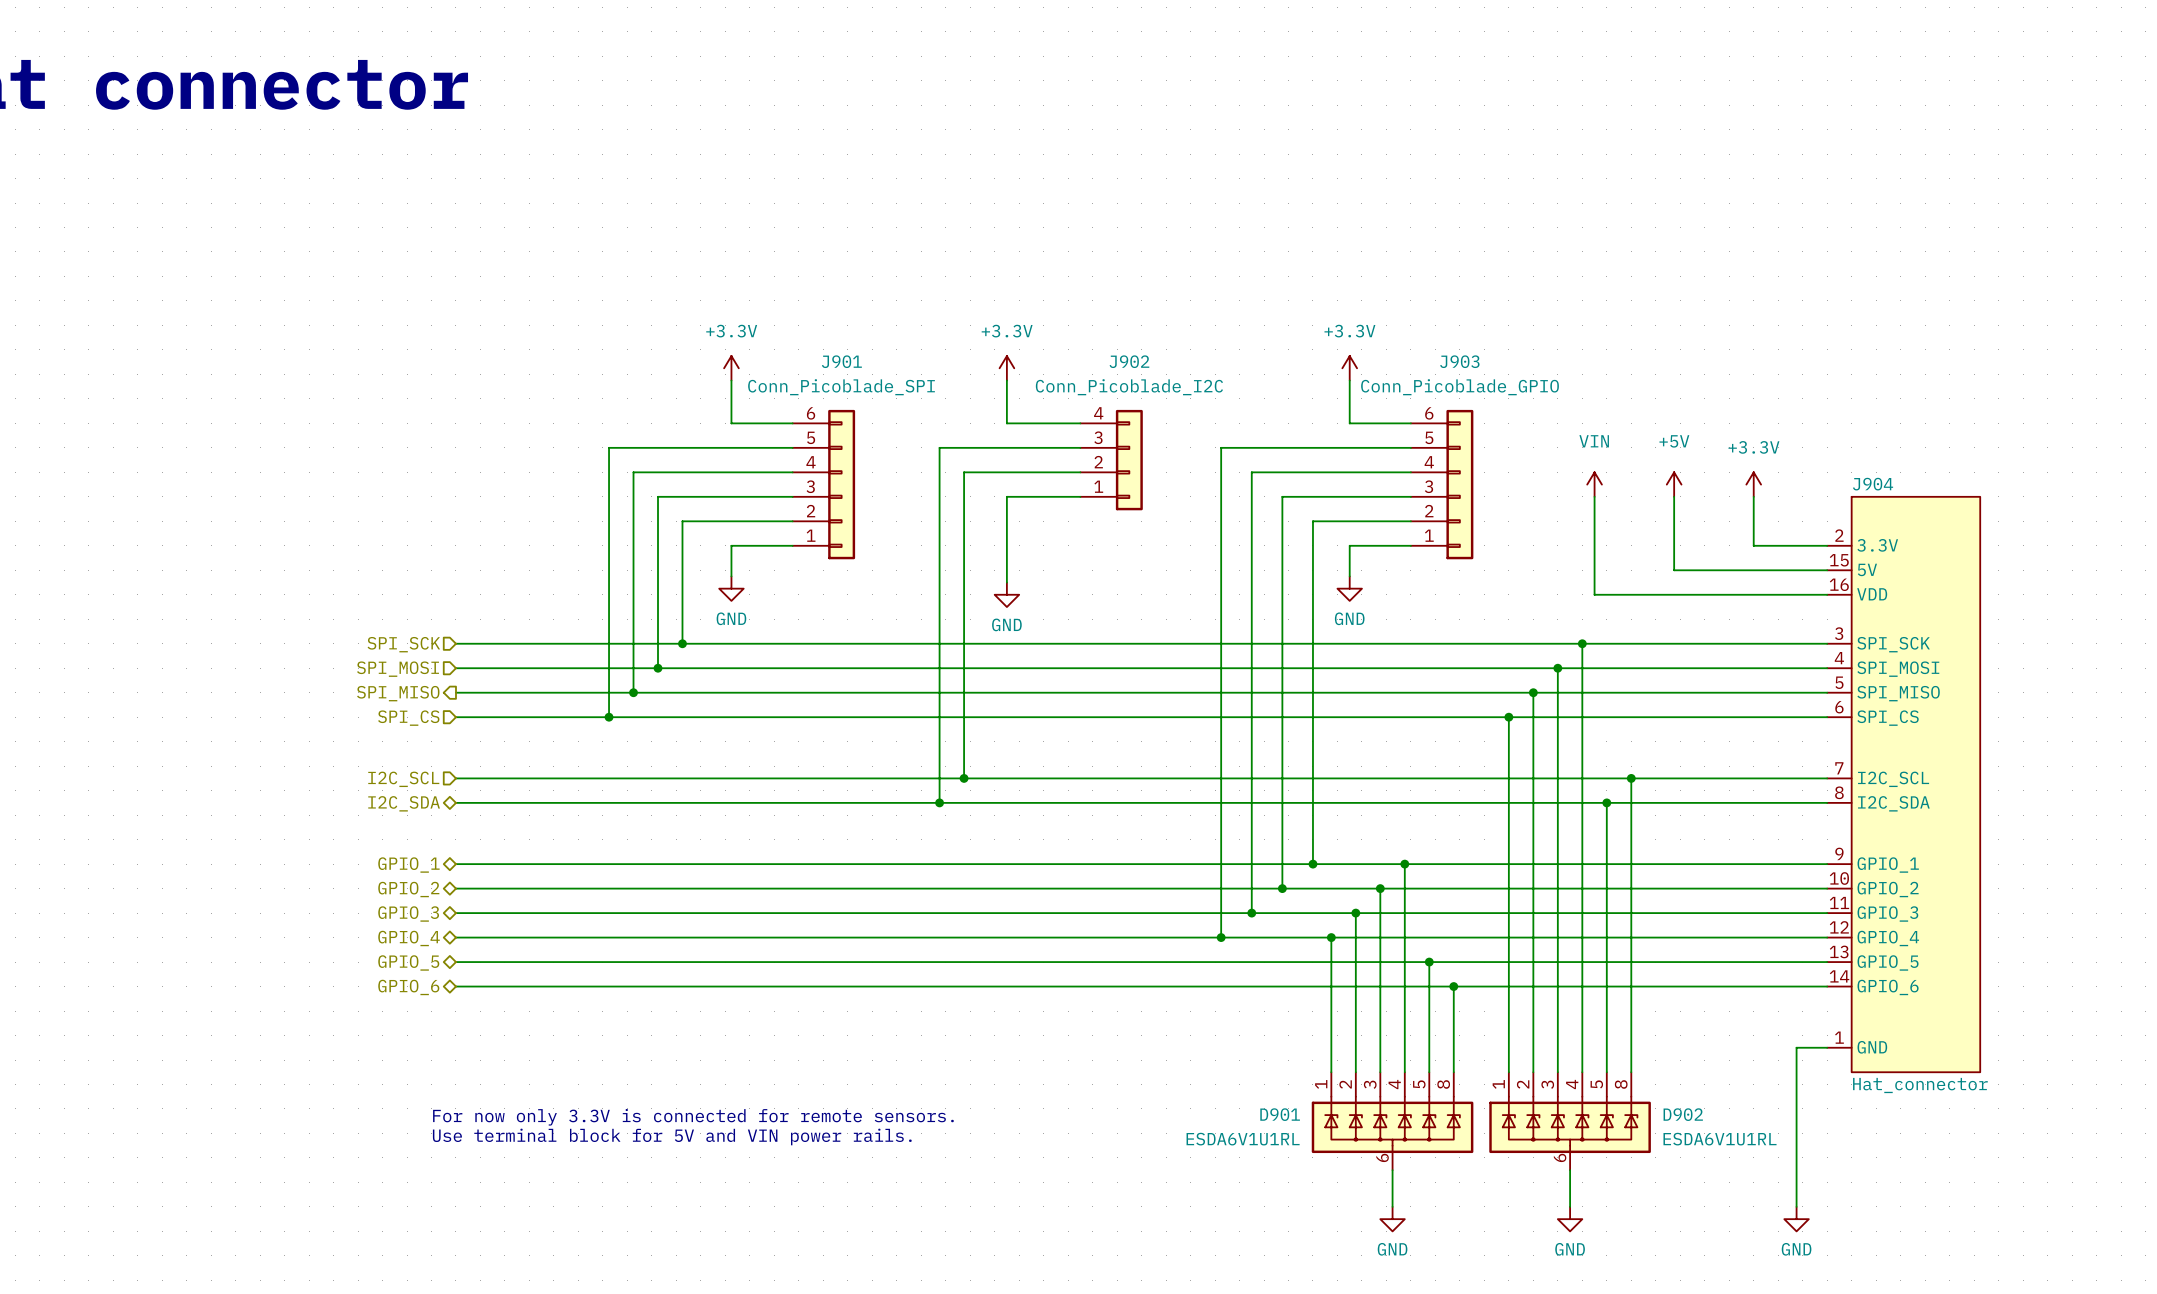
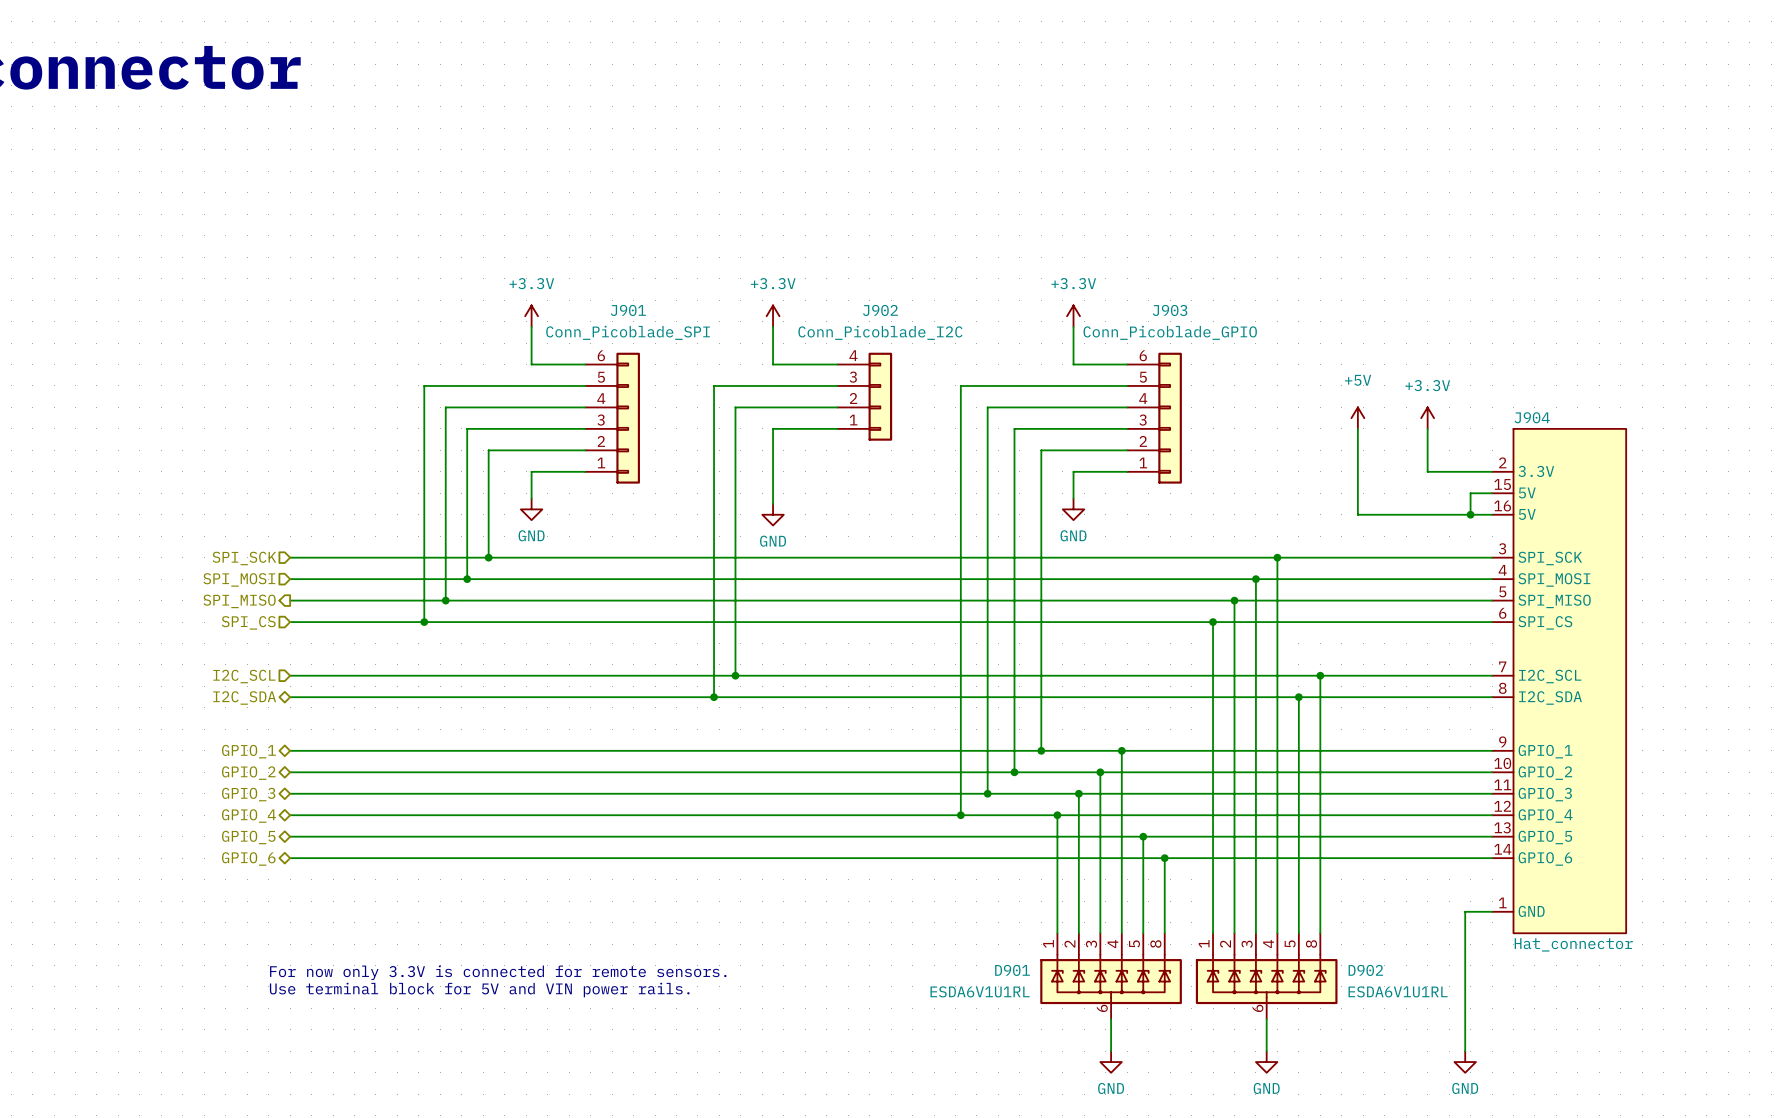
power symbol: VIN (1594, 484) -> none
wire: (1594, 496) (1594, 594) (1674, 594) -> (1357, 493) (1357, 514)
wire: (1674, 570) (1802, 570) -> (1470, 514) (1470, 493)
junction: none -> (1470, 514)
J904 pin name: VDD (1872, 594) -> 5V (1527, 514)

